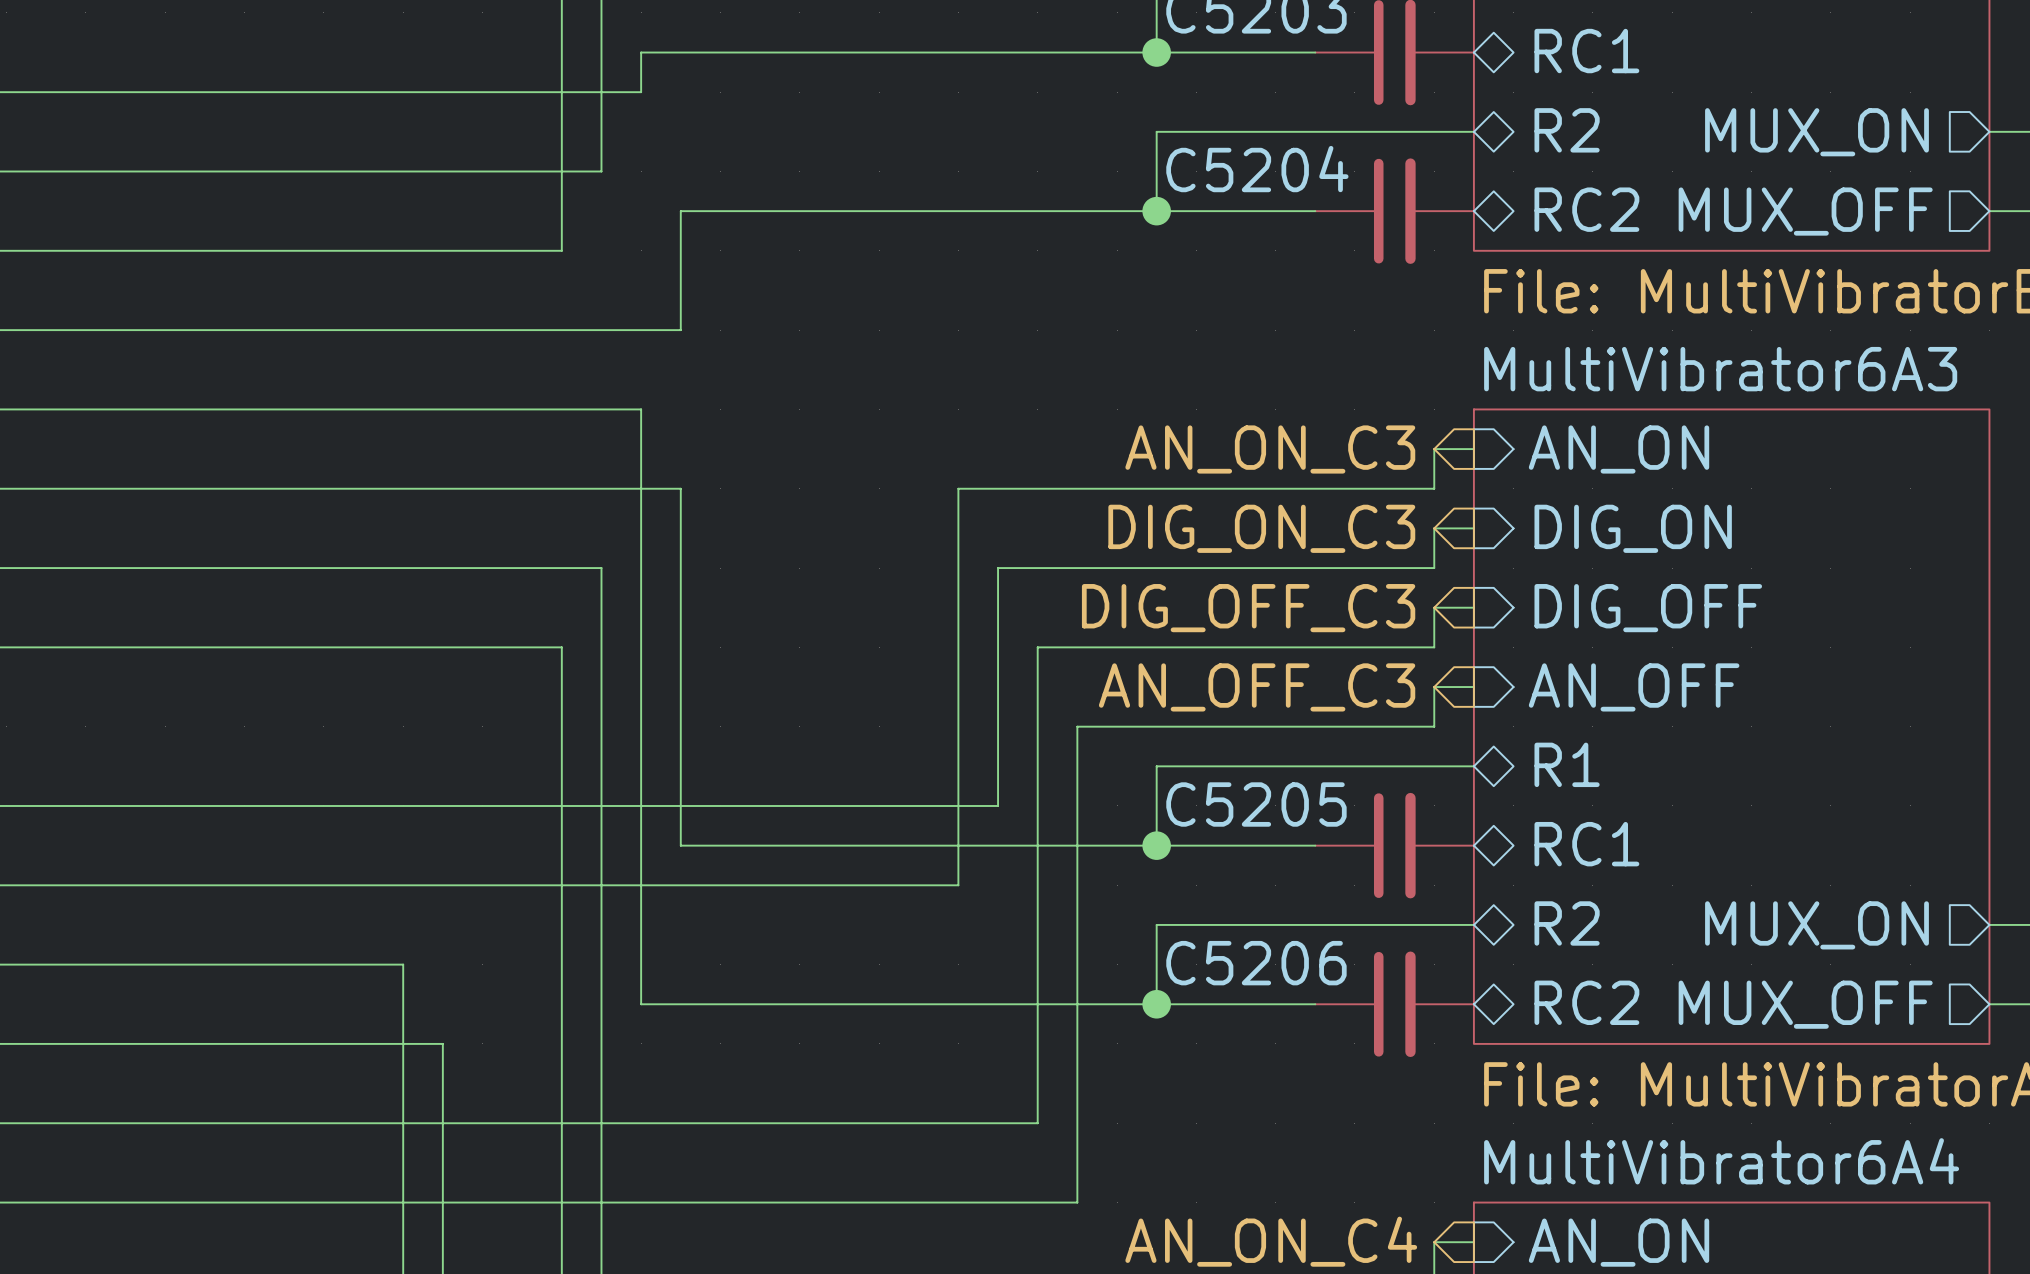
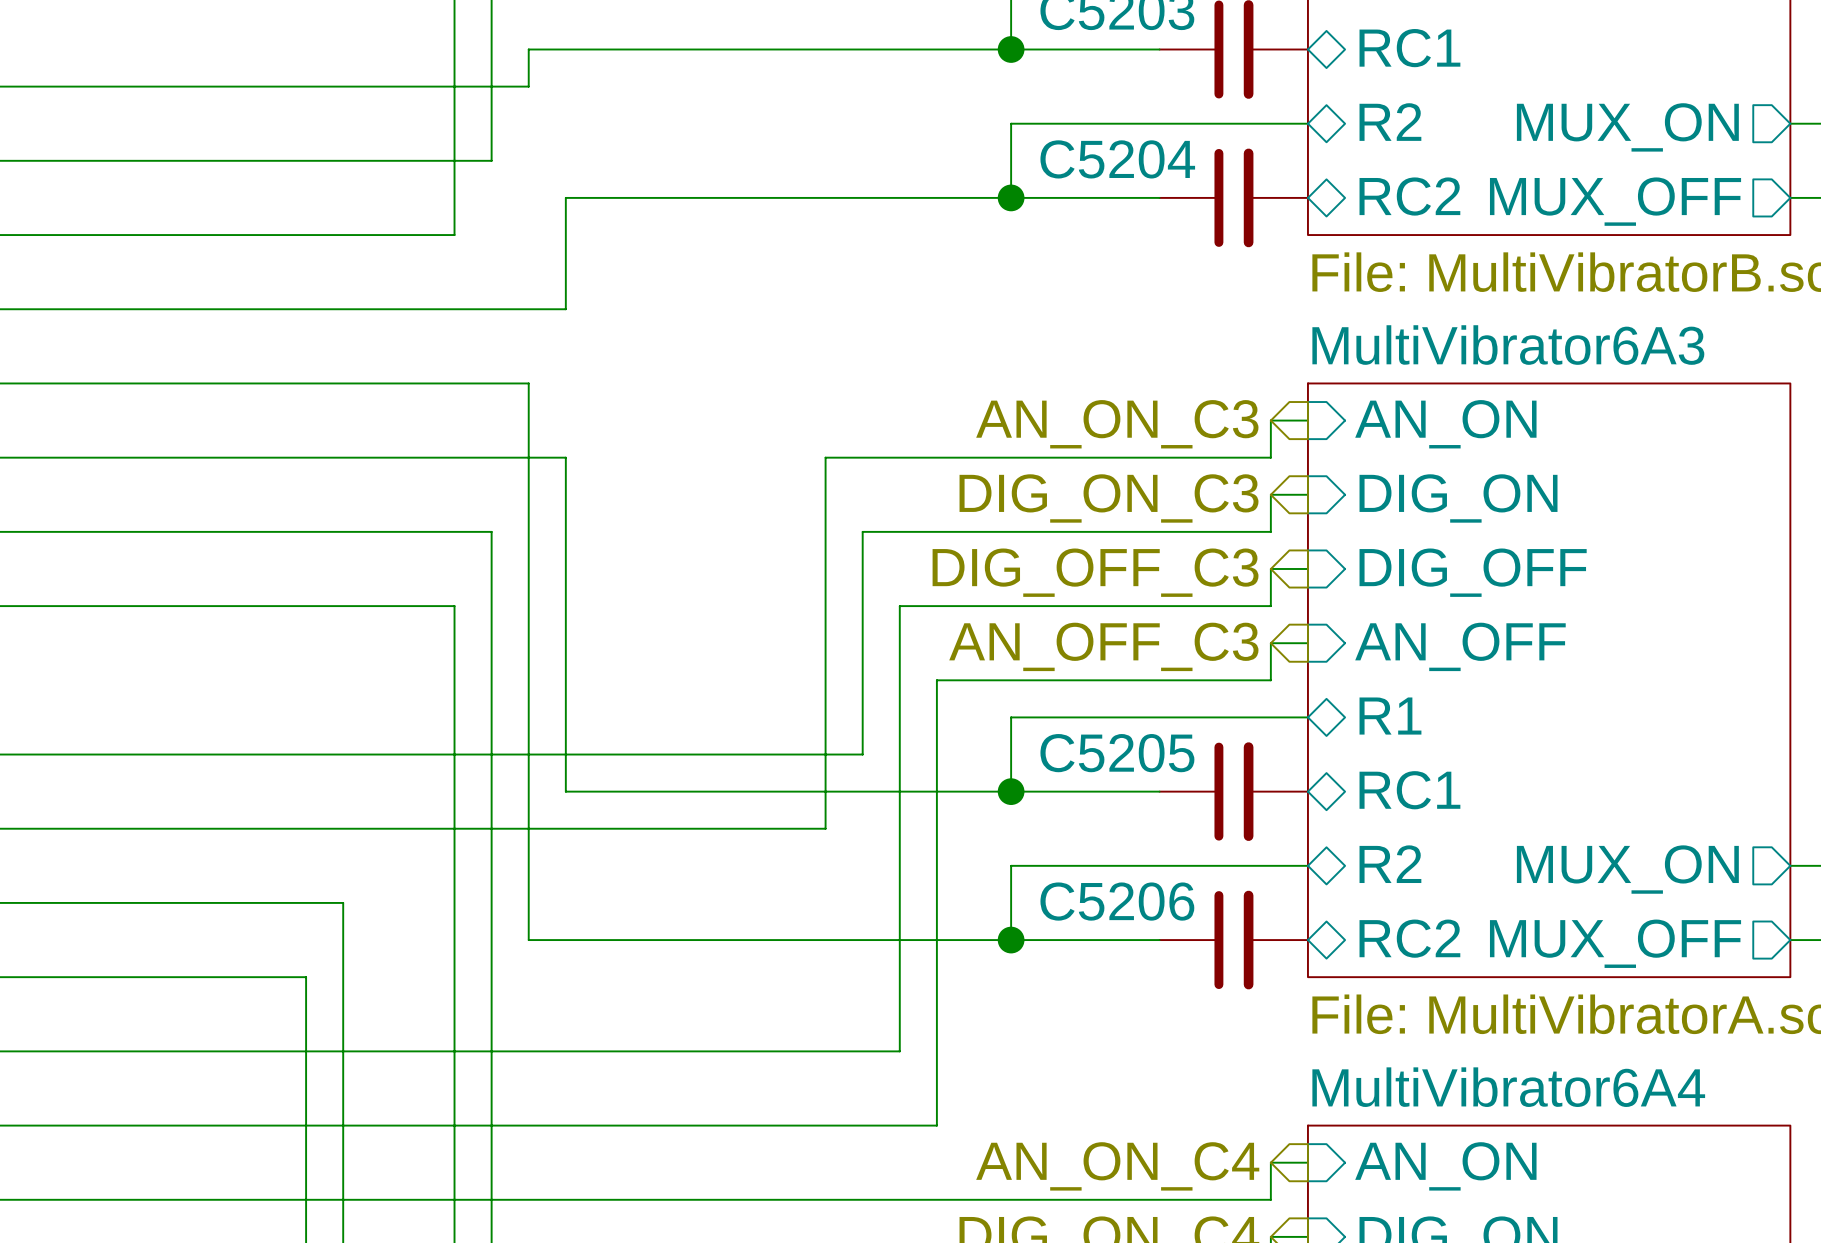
wire: (403, 964) (403, 1043) (442, 1043) -> (306, 902) (343, 902) (343, 977)

